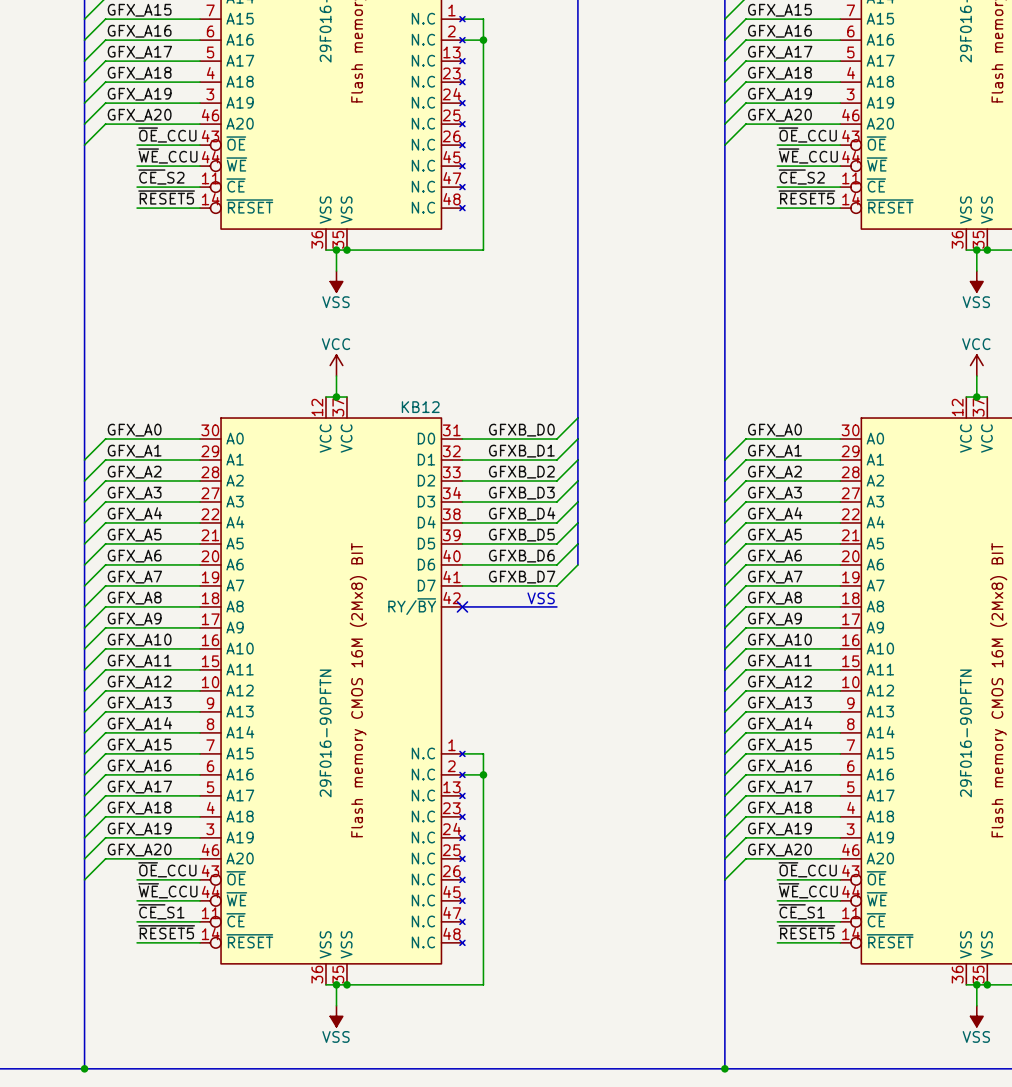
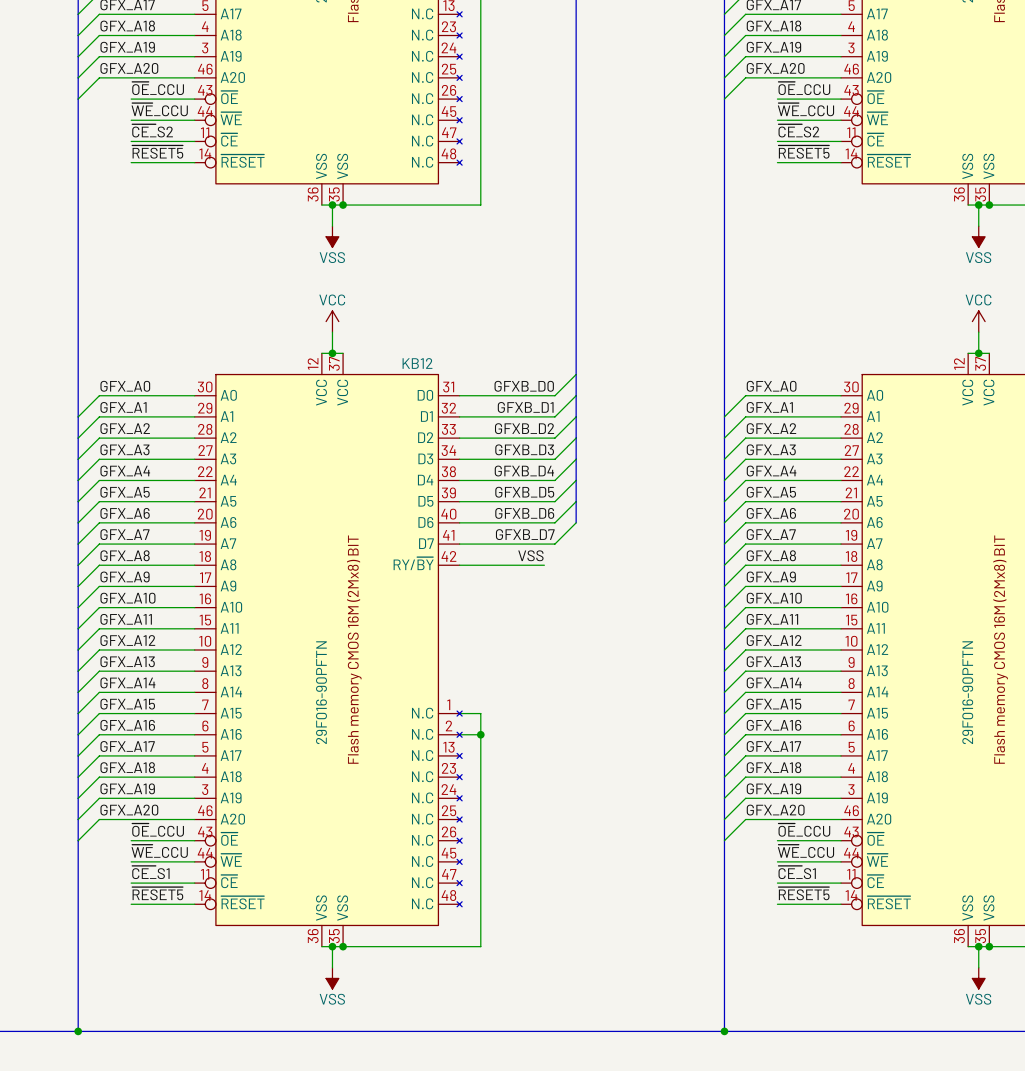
label: none -> VSS (530, 555)
text: VSS (541, 598) -> none
line: (462, 606) (556, 606) -> none
no-connect mark: (462, 606) -> none

